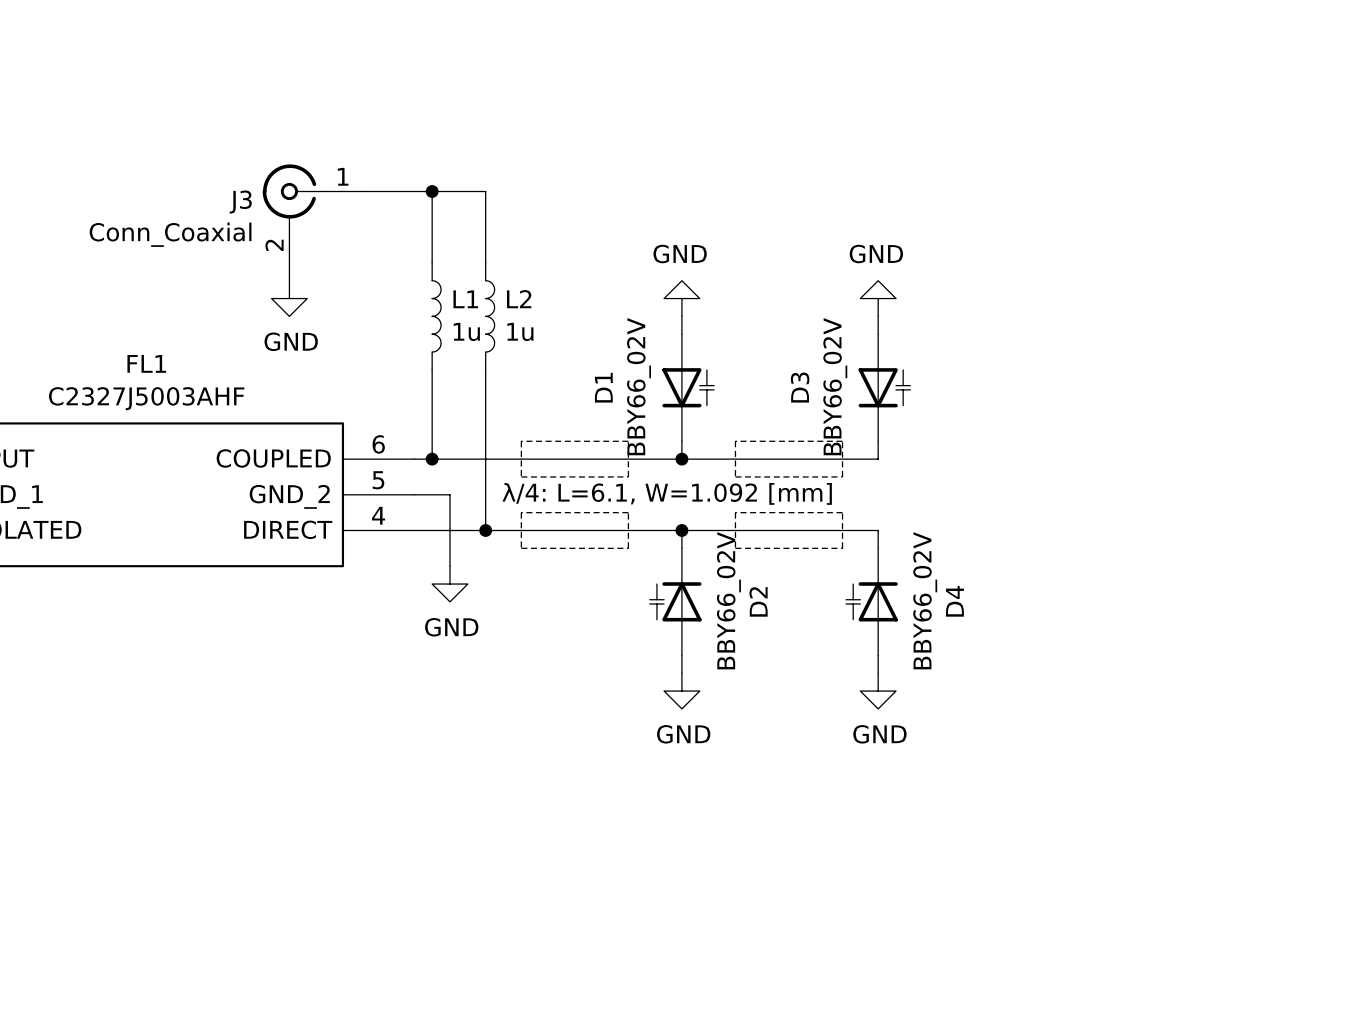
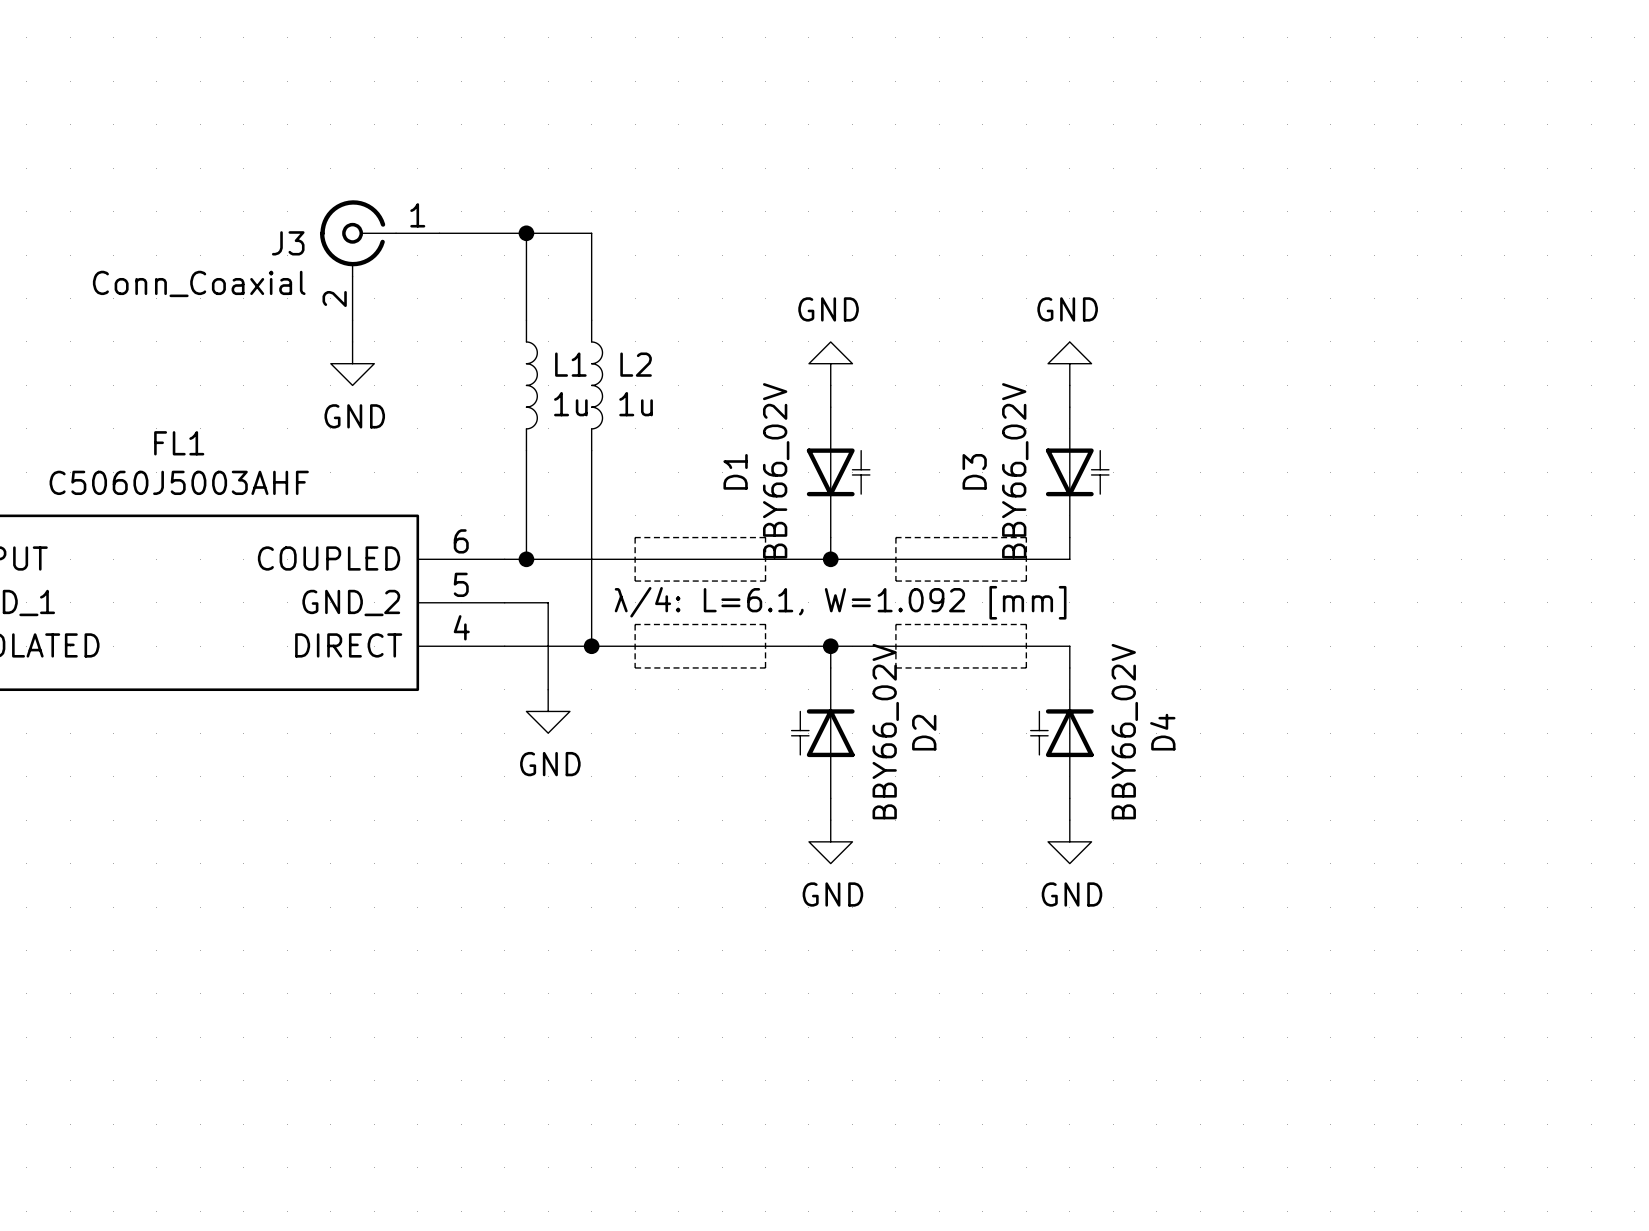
FL1 value: C2327J5003AHF (146, 398) -> C5060J5003AHF (179, 482)

